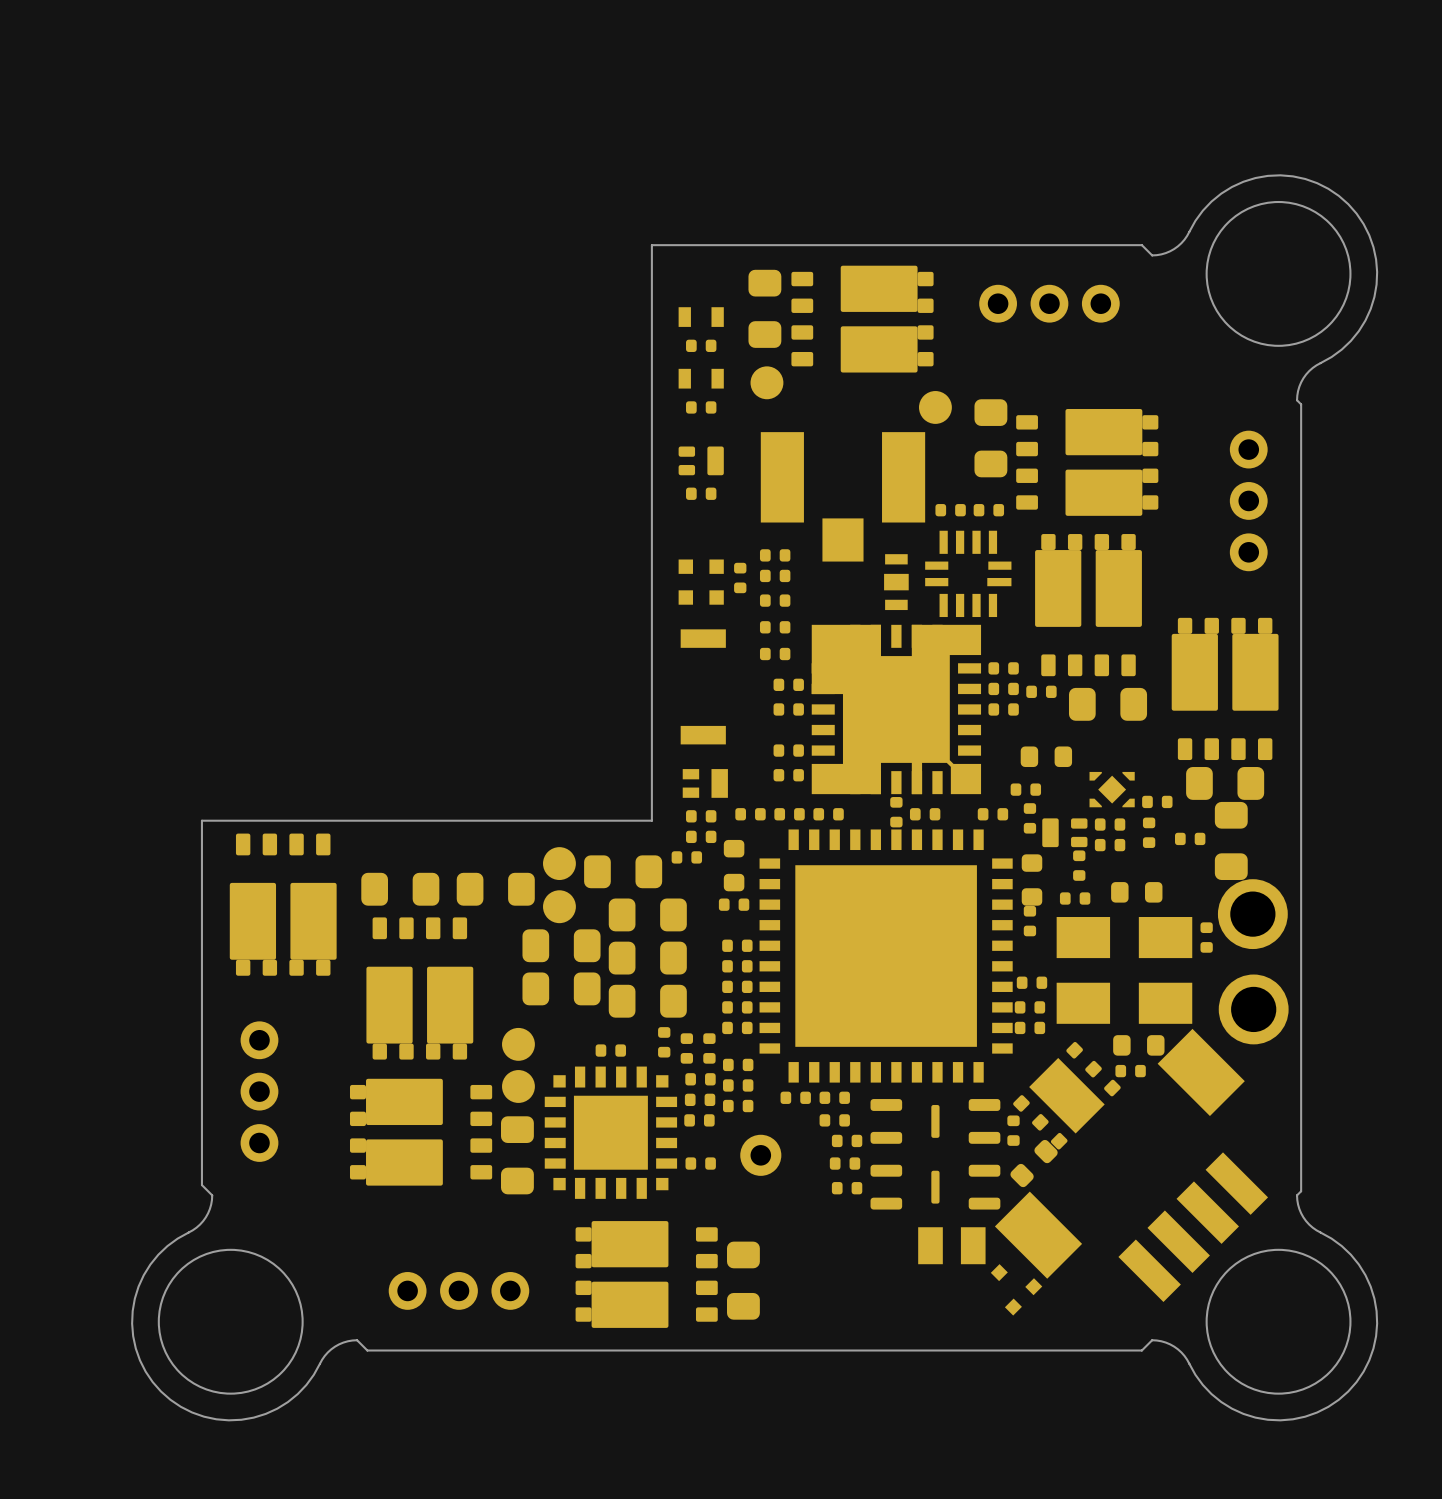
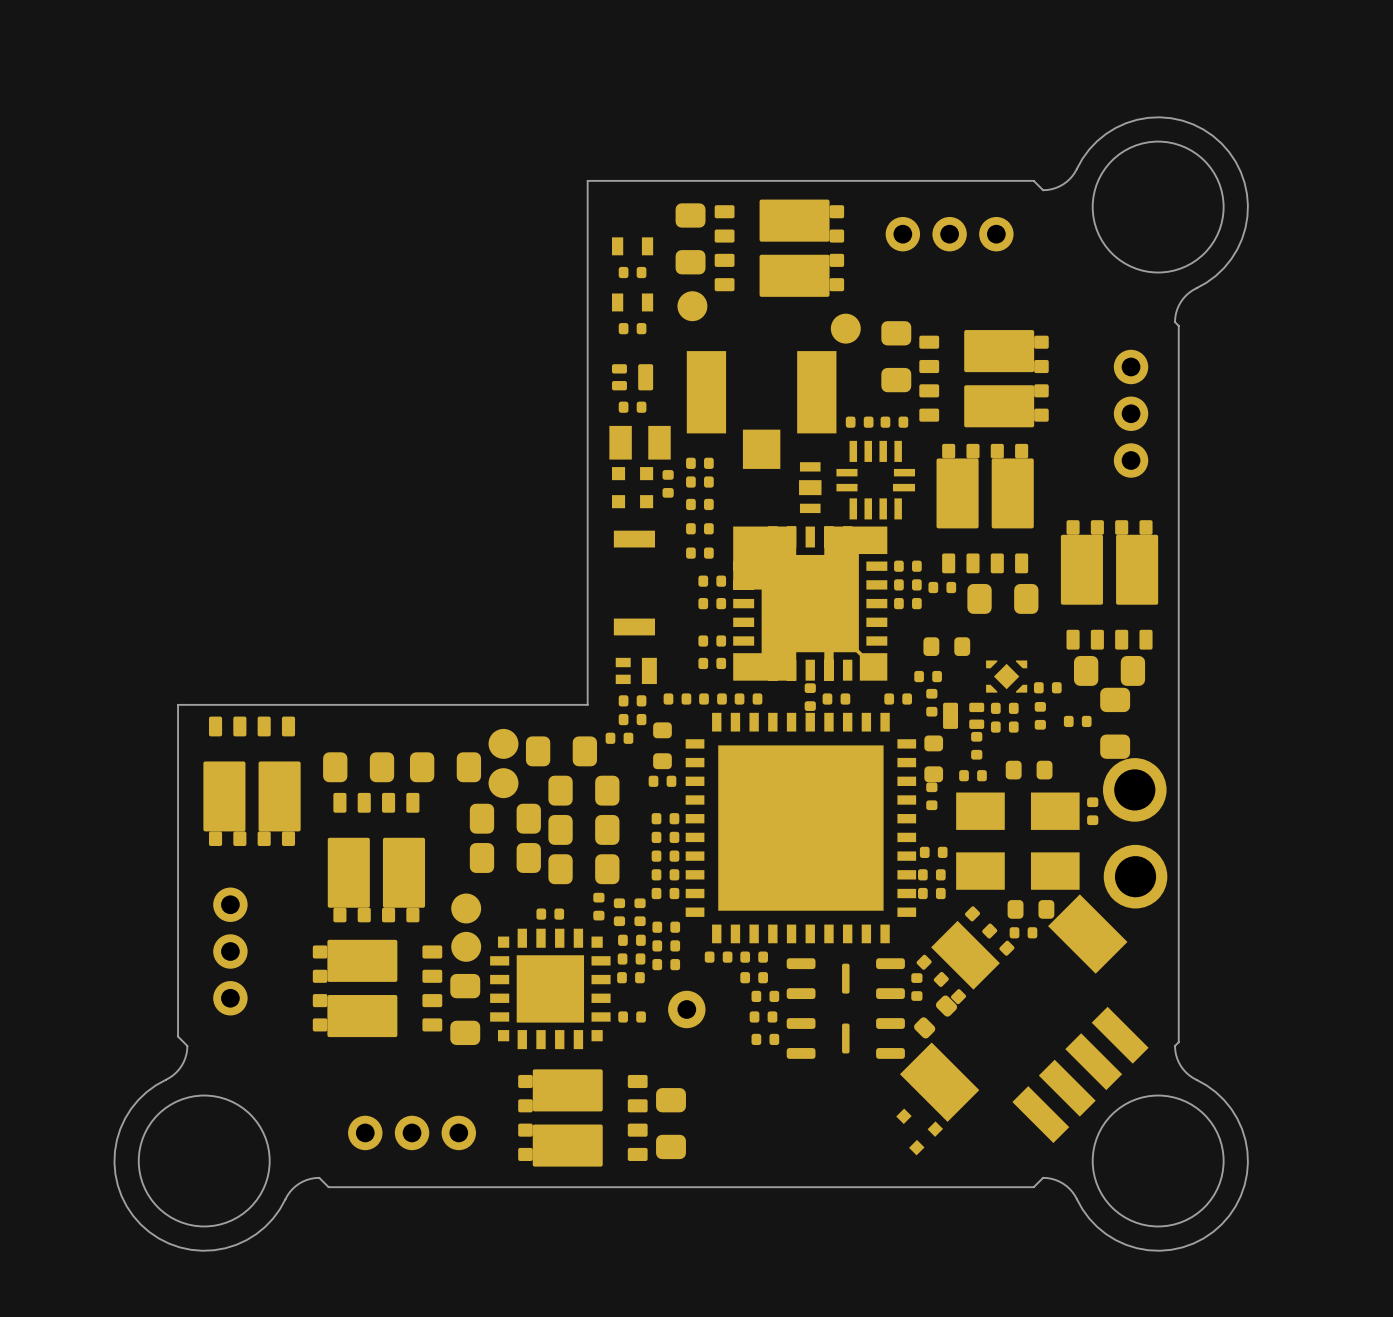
part position: (951, 1245) -> (640, 442)

